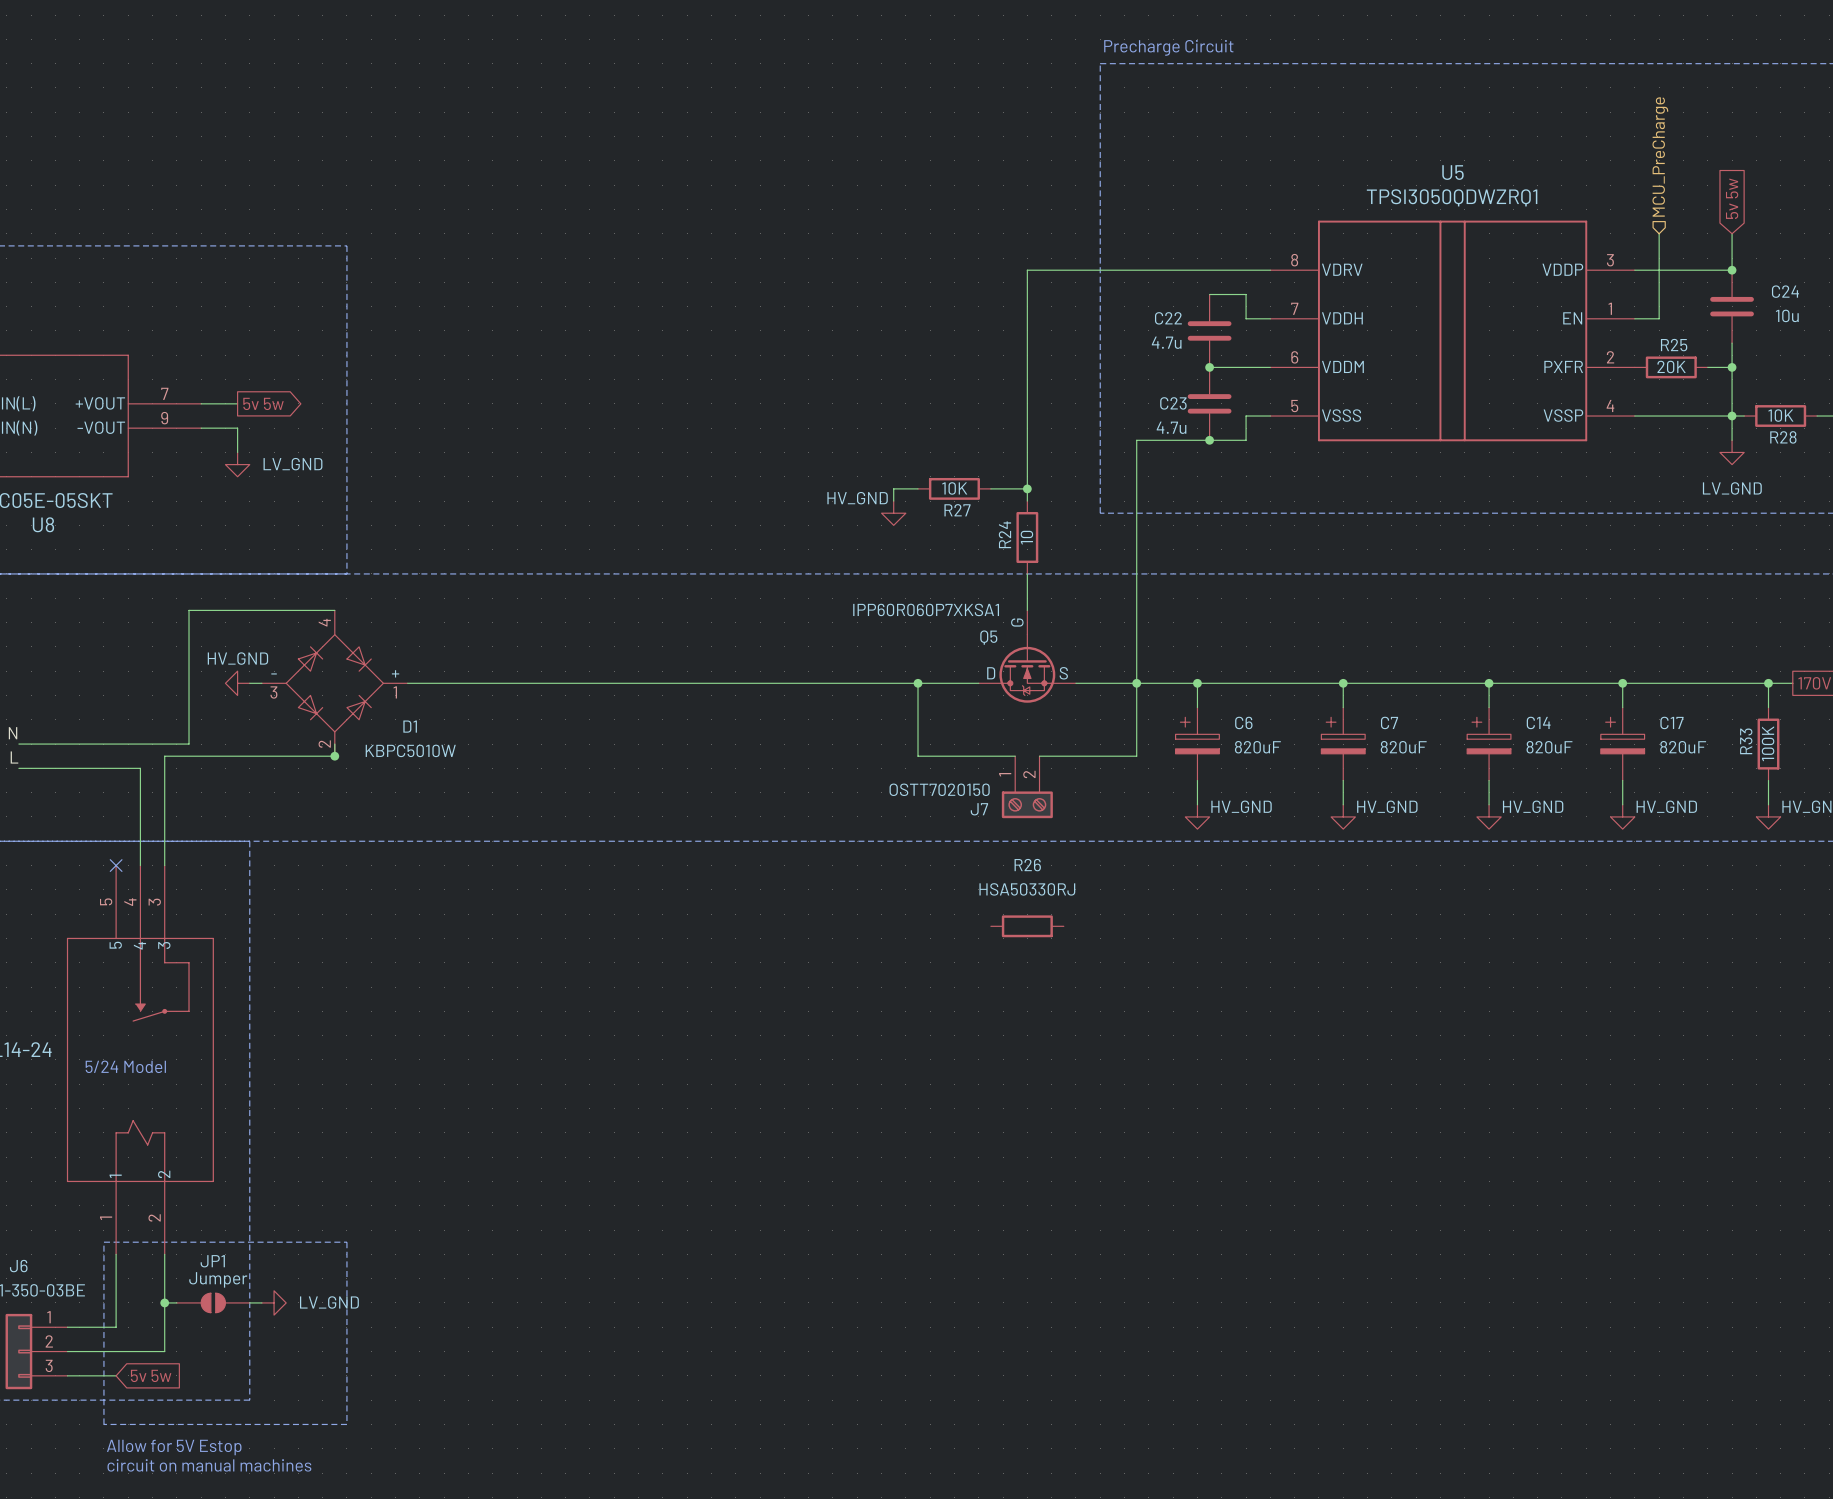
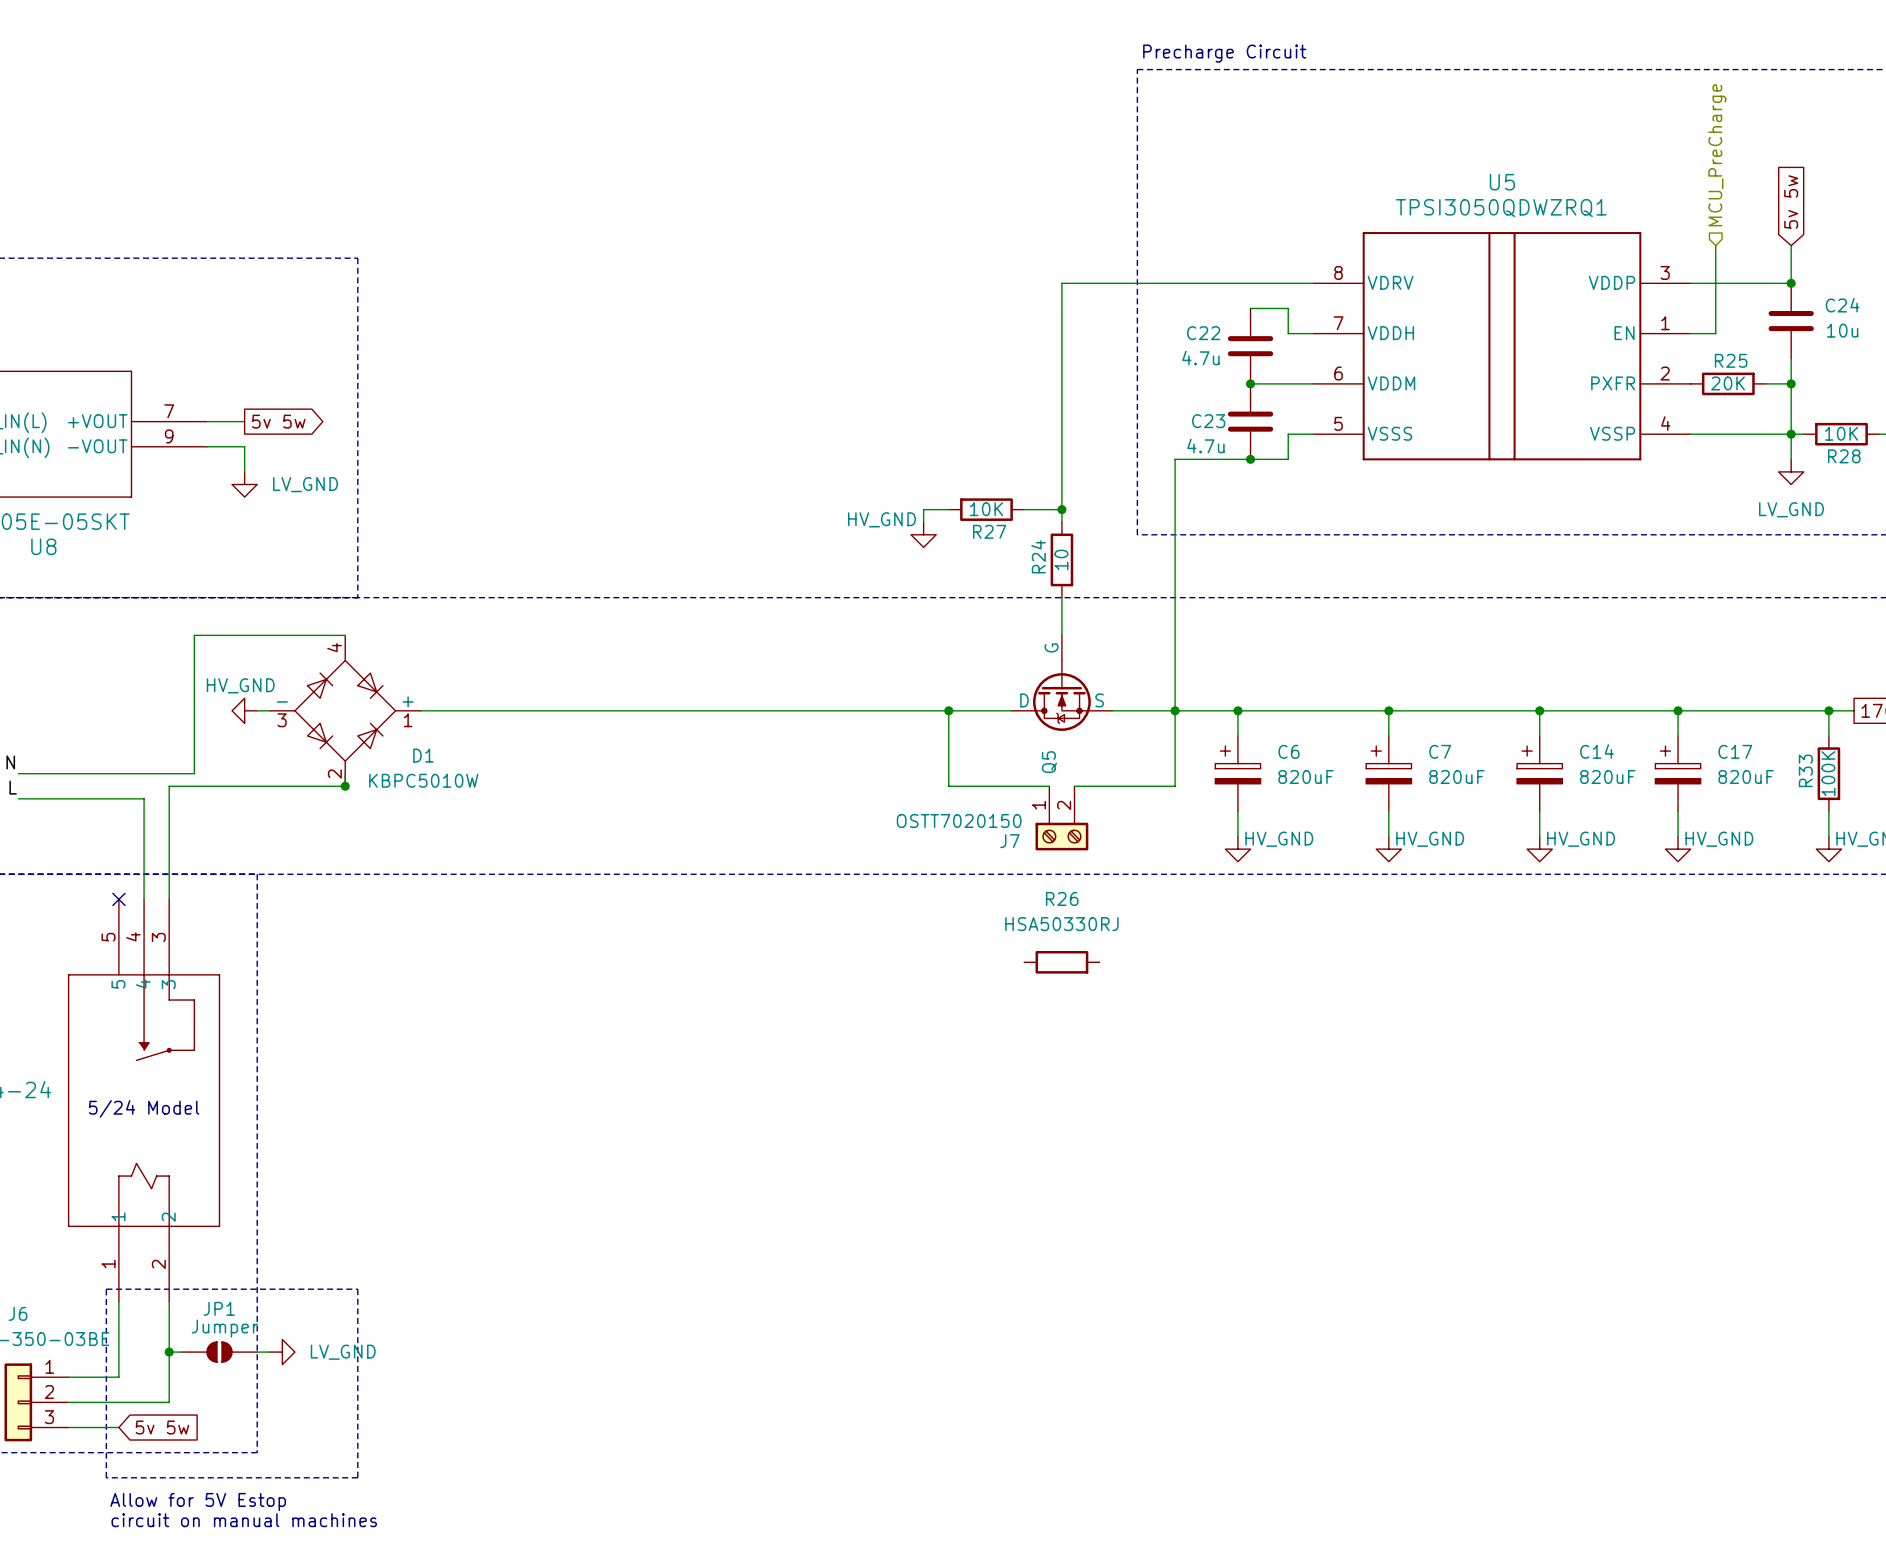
Q5 value: IPP60R060P7XKSA1 (926, 609) -> none
Q5 name rotation: 0° (988, 637) -> 90° counterclockwise (1049, 762)
Q5 name position: Q5 (988, 637) -> Q5 (1049, 762)

